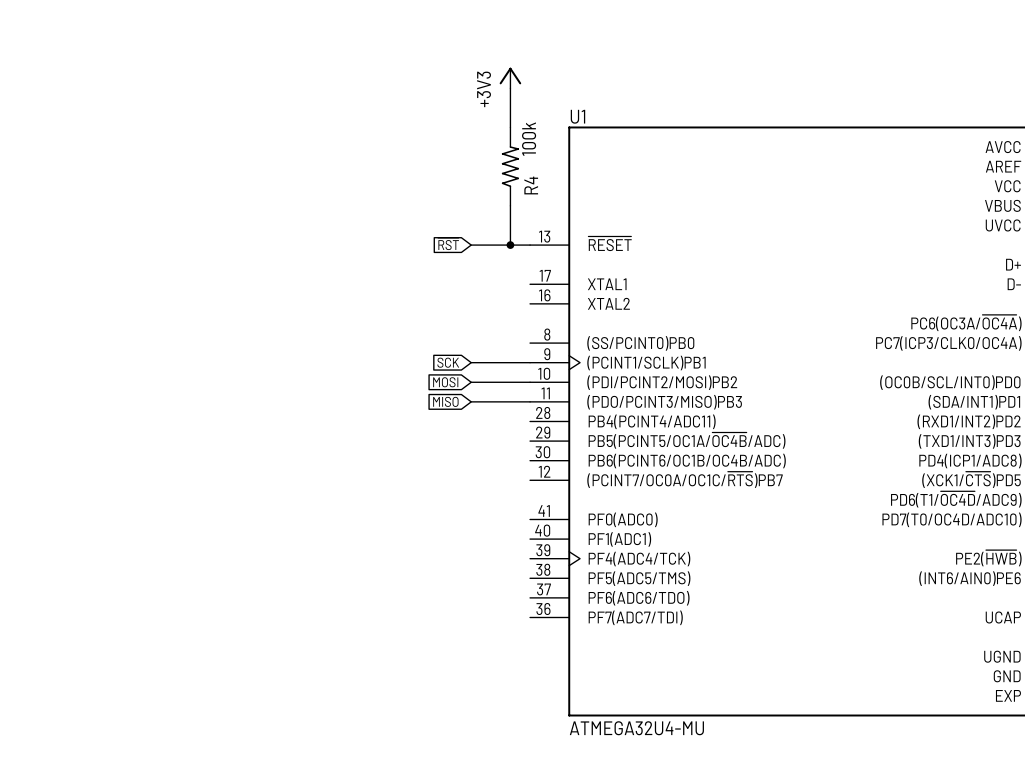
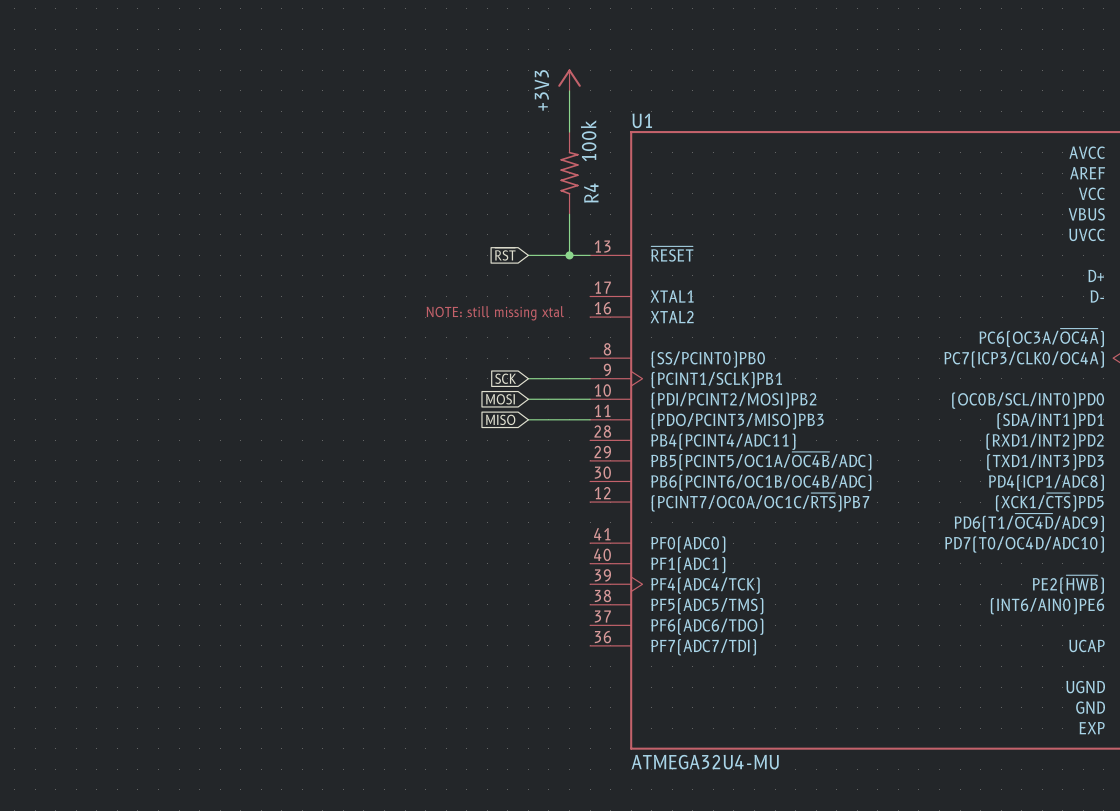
text: none -> NOTE: still missing xtal (495, 313)

